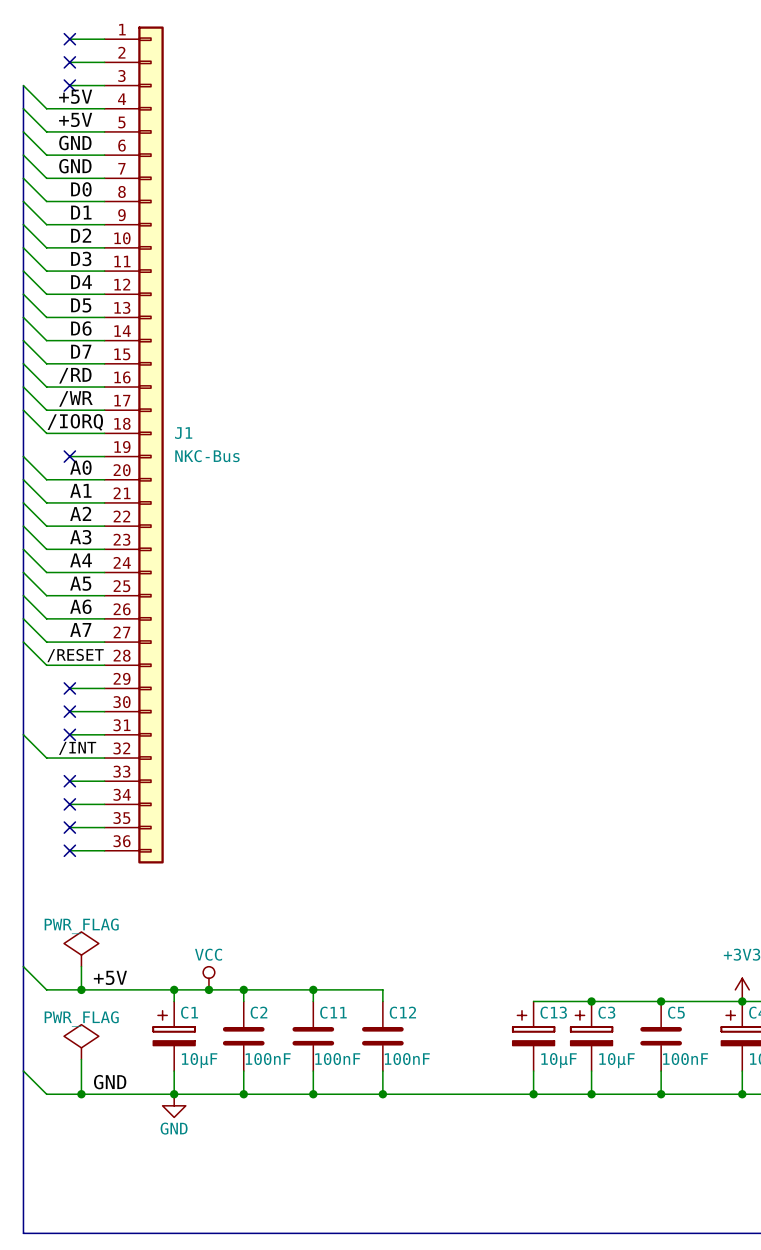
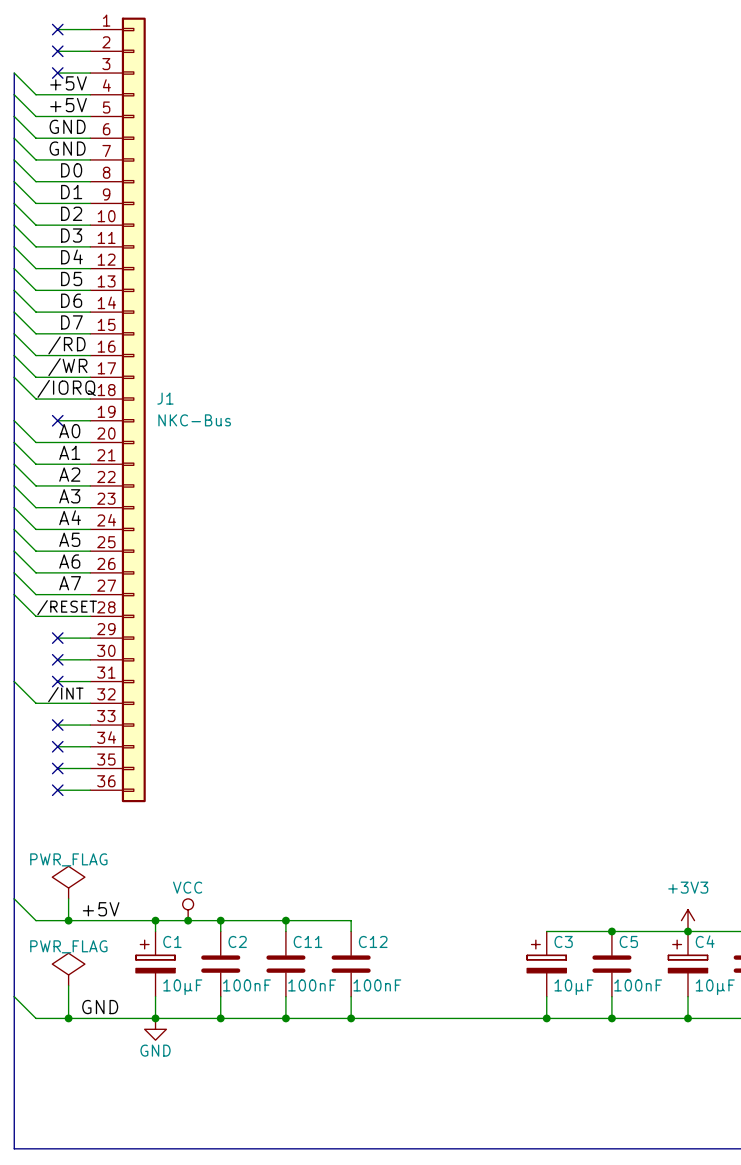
wire: (533, 1001) (591, 1001) -> none
junction: (591, 1001) -> none
C13: 10µF (533, 1036) -> none
wire: (533, 1071) (533, 1094) -> none
junction: (533, 1094) -> none

